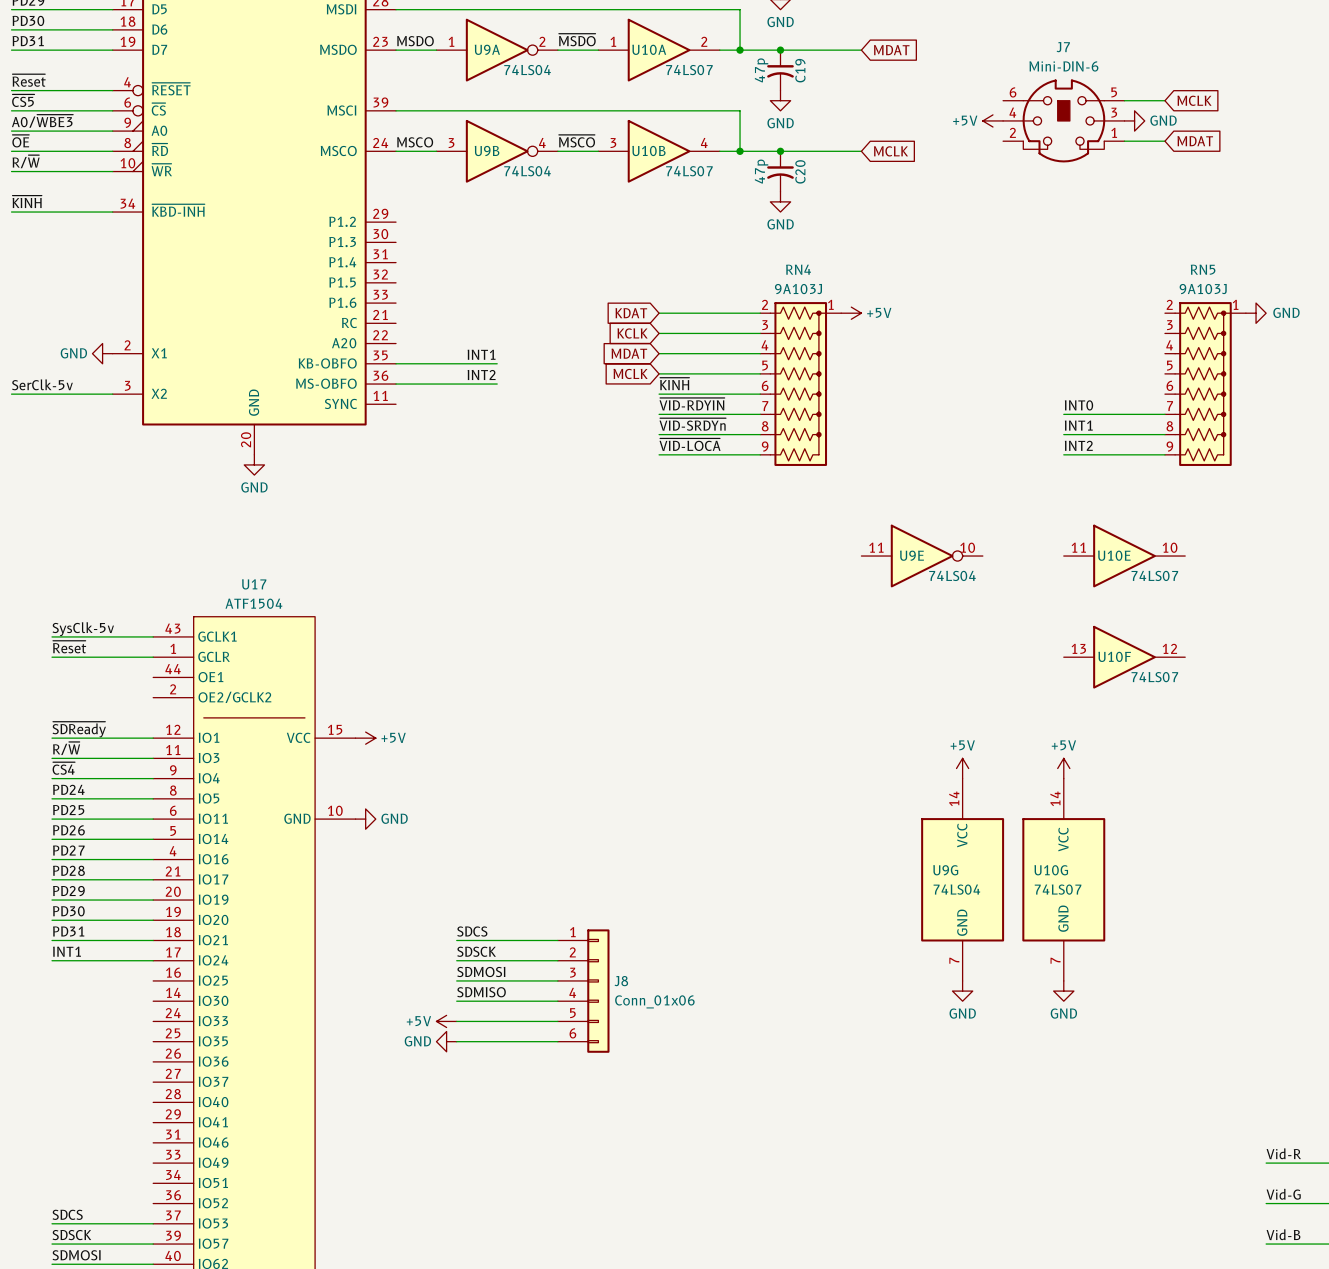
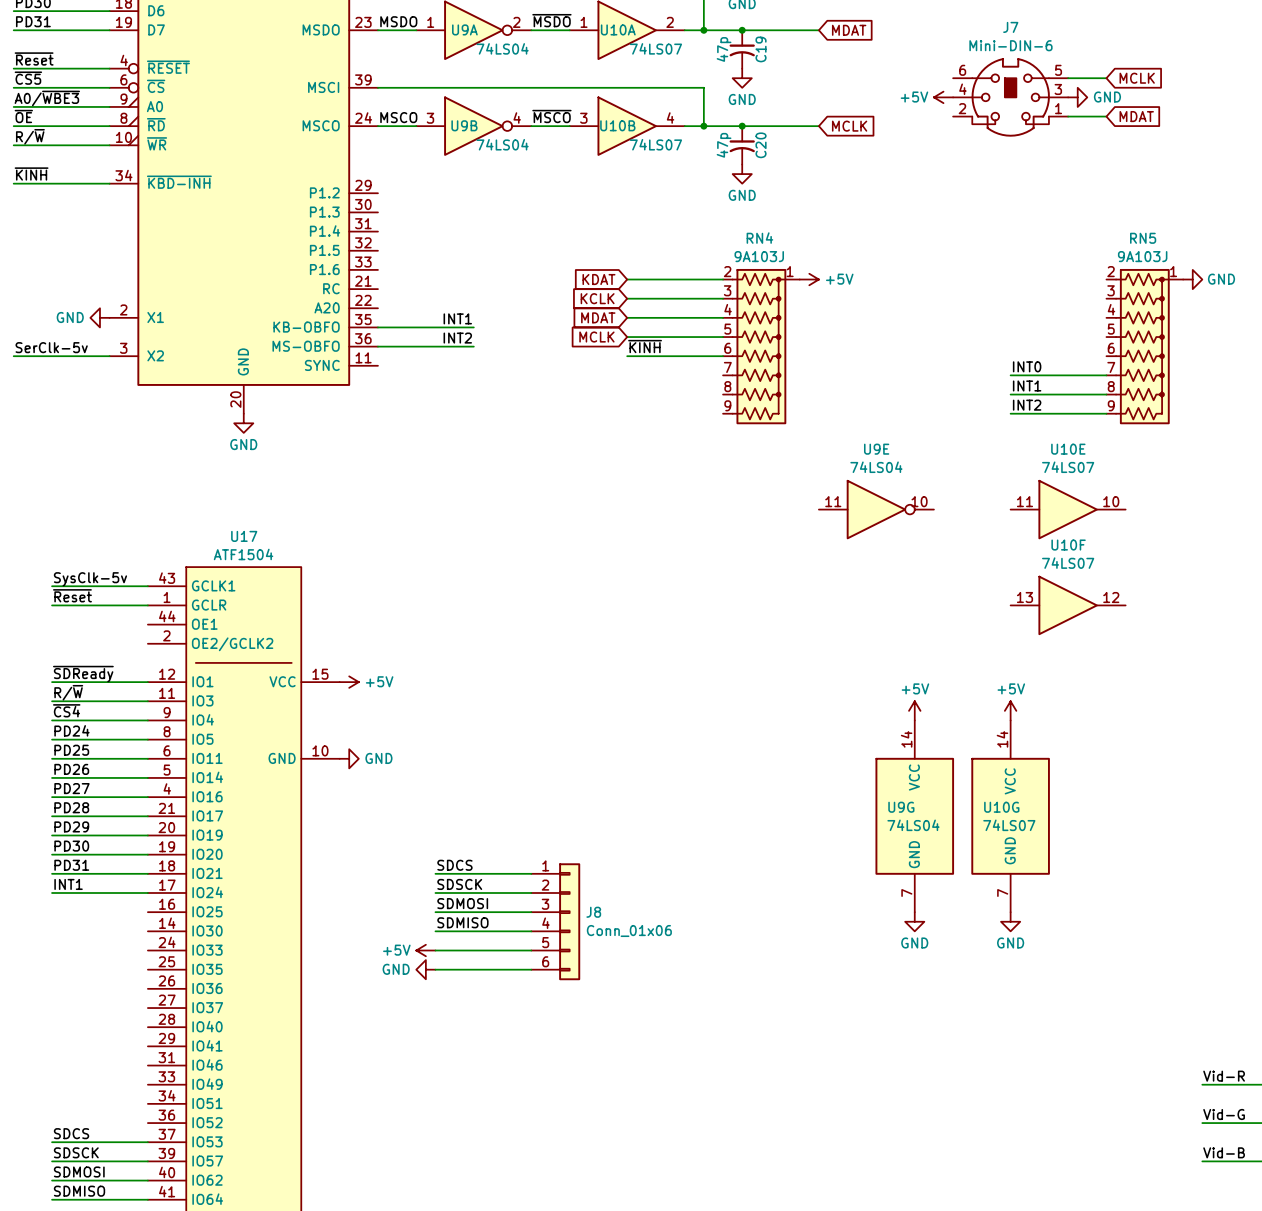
label: ~{VID-RDYIN} (692, 404) -> none
wire: (659, 414) (760, 414) -> none
label: ~{VID-SRDYn} (692, 424) -> none
wire: (659, 434) (760, 434) -> none
label: ~{VID-LOCA} (690, 444) -> none
wire: (659, 454) (760, 454) -> none
U9E name position: U9E (912, 555) -> U9E (876, 449)
U10E name position: U10E (1114, 555) -> U10E (1068, 449)
U9E value position: 74LS04 (952, 575) -> 74LS04 (876, 467)
U10E value position: 74LS07 (1154, 575) -> 74LS07 (1068, 467)
U10F name position: U10F (1114, 656) -> U10F (1068, 545)
U10F value position: 74LS07 (1154, 677) -> 74LS07 (1068, 563)

